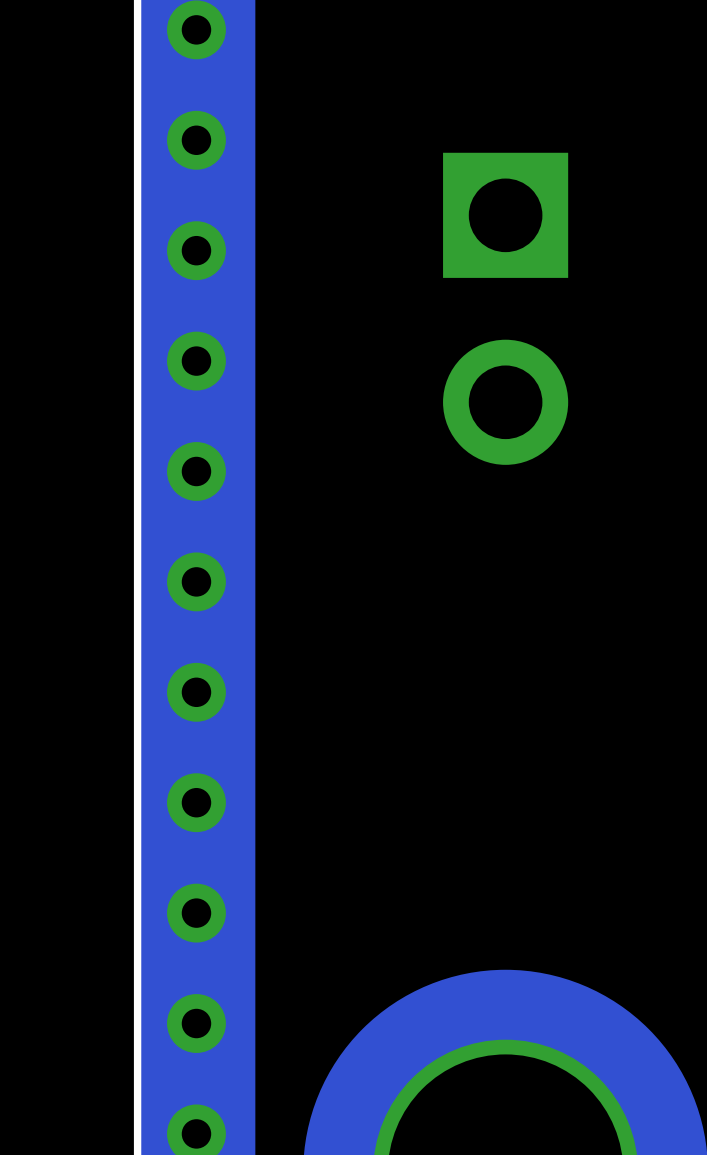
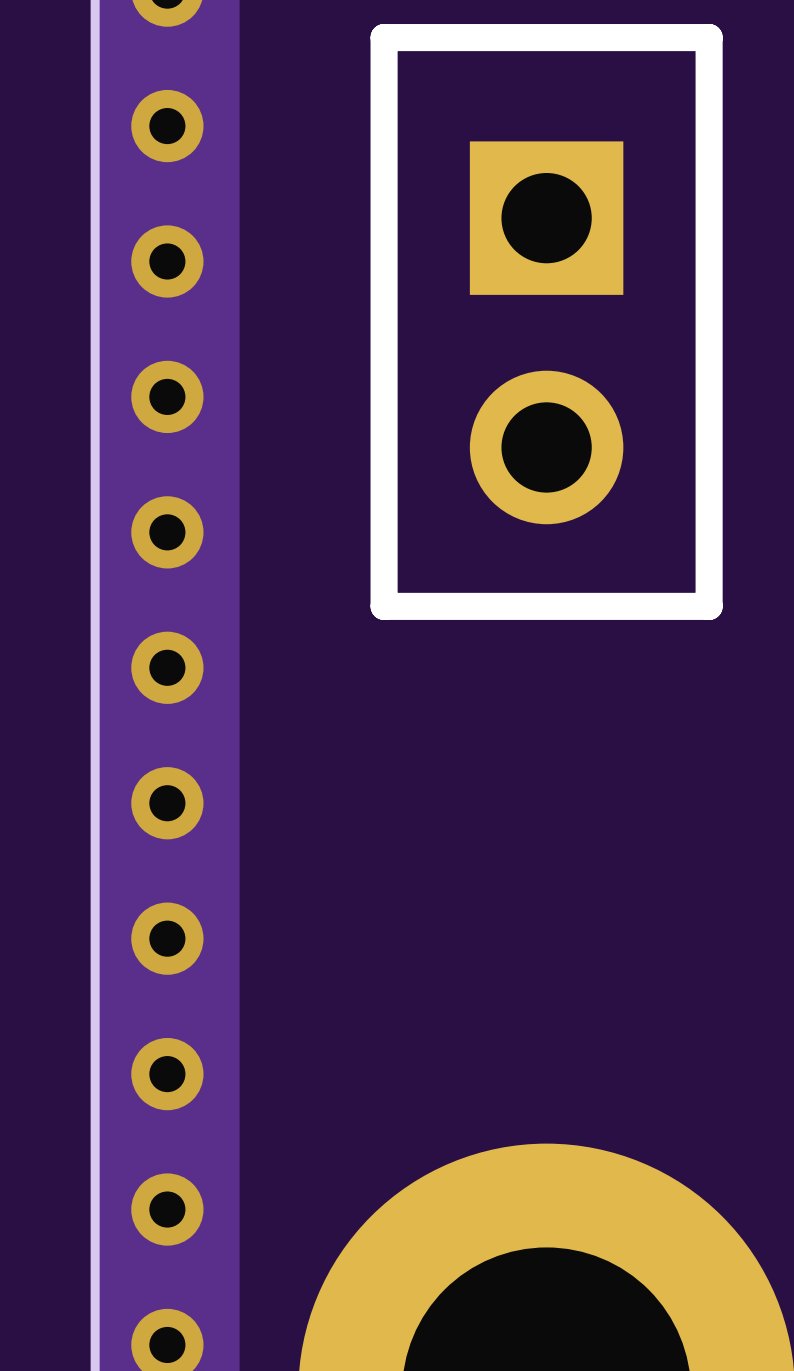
line: none -> (709, 37) (709, 606) (384, 606) (384, 37) (709, 37)

